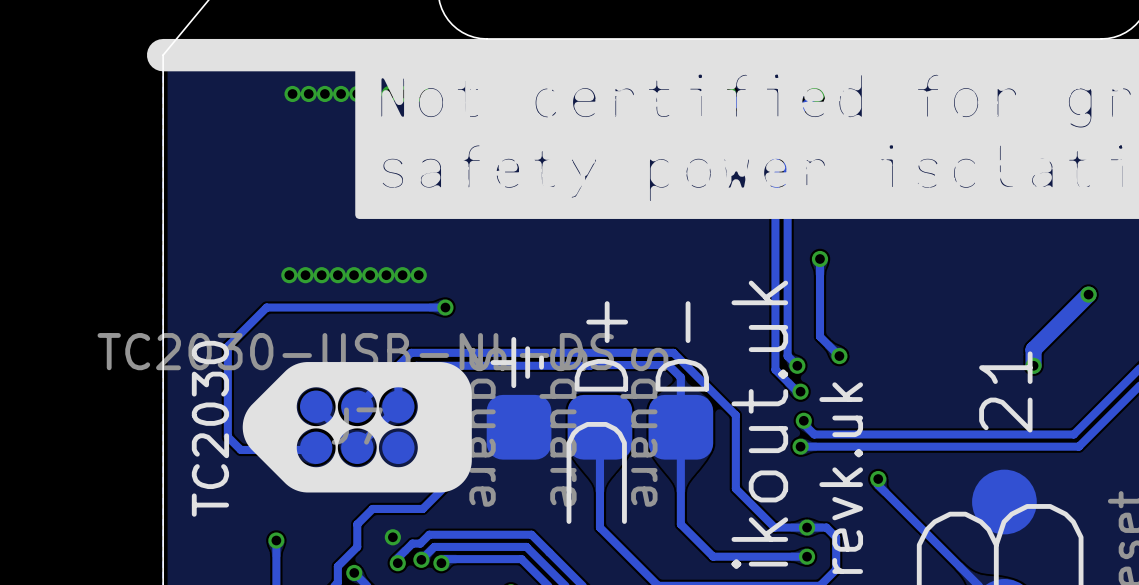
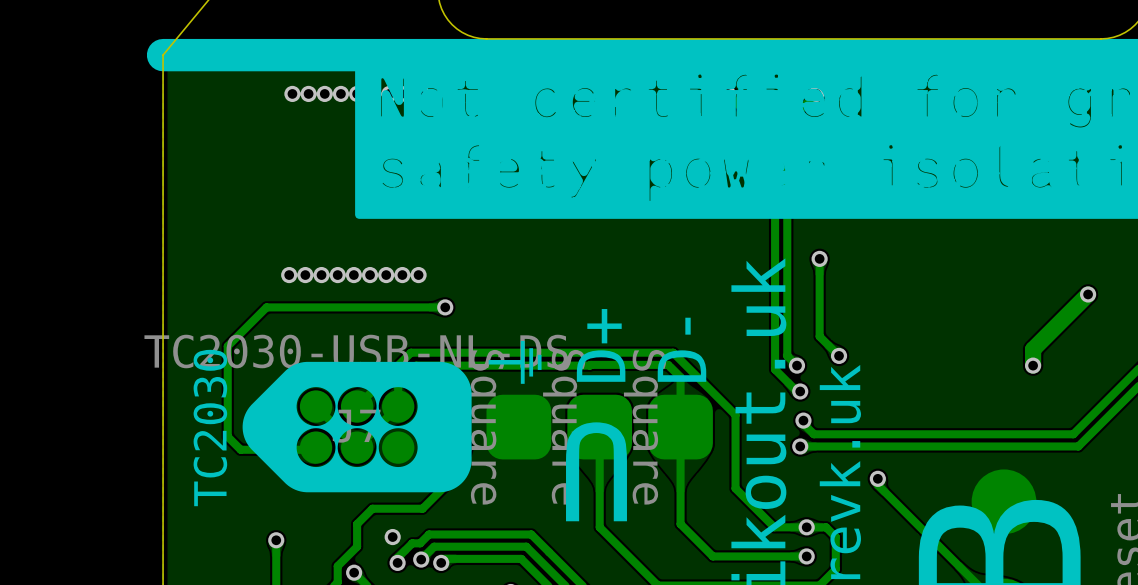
text: 21 (1005, 391) -> none

